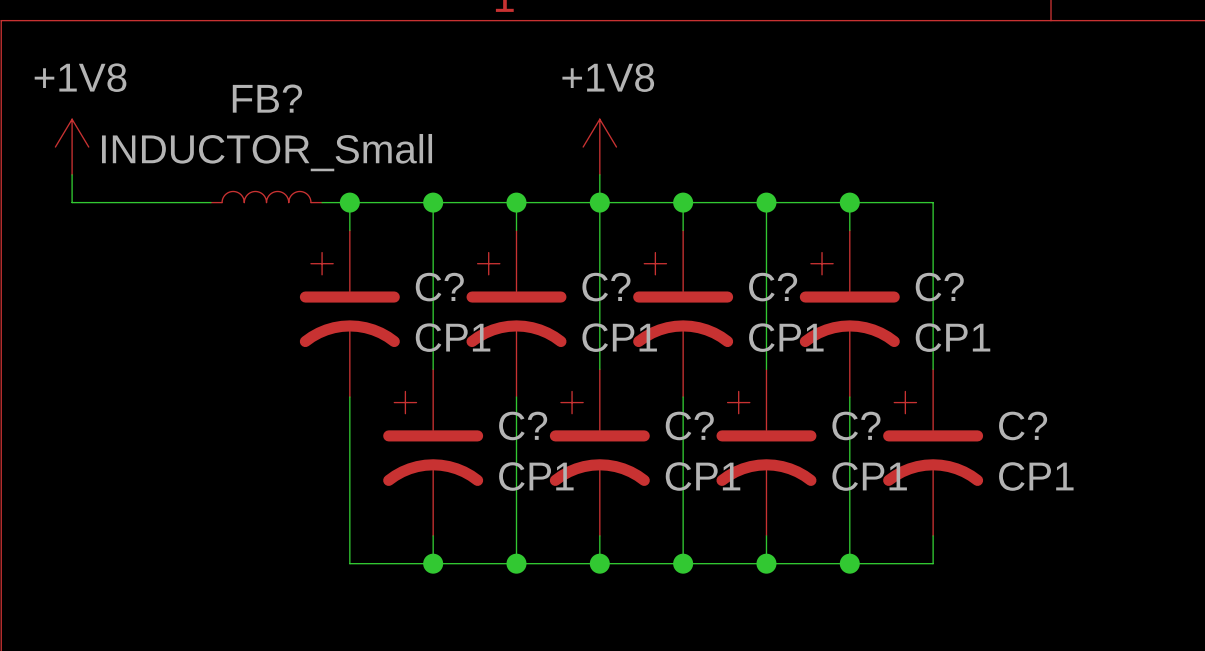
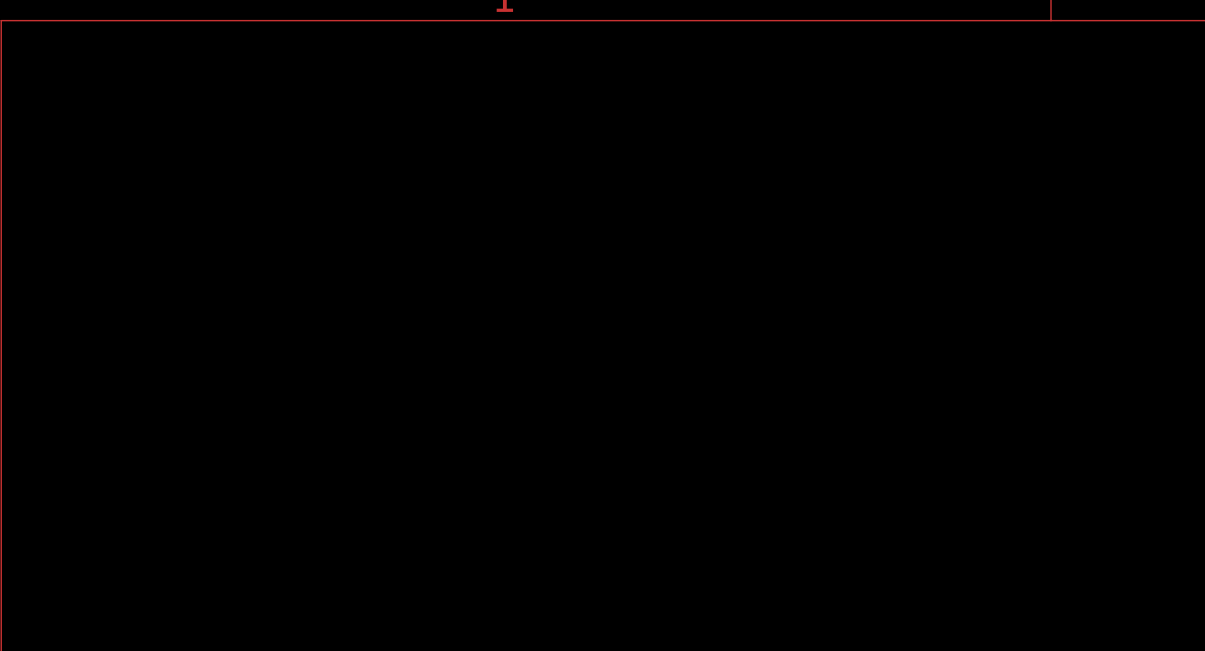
power symbol: +1V8 (72, 147) -> none
power symbol: +1V8 (599, 147) -> none
wire: (72, 174) (72, 202) (210, 202) -> none
wire: (599, 174) (599, 369) -> none
FB?: INDUCTOR_Small (266, 197) -> none
wire: (322, 202) (933, 202) (933, 369) -> none
wire: (349, 202) (349, 230) -> none
junction: (349, 202) -> none
wire: (433, 202) (433, 369) -> none
junction: (433, 202) -> none
wire: (516, 202) (516, 230) -> none
junction: (516, 202) -> none
junction: (599, 202) -> none
wire: (683, 202) (683, 230) -> none
junction: (683, 202) -> none
wire: (766, 202) (766, 369) -> none
junction: (766, 202) -> none
wire: (849, 202) (849, 230) -> none
junction: (849, 202) -> none
C?: CP1 (349, 313) -> none
C?: CP1 (516, 313) -> none
C?: CP1 (683, 313) -> none
C?: CP1 (849, 313) -> none
wire: (349, 397) (349, 563) (933, 563) (933, 535) -> none
wire: (516, 397) (516, 563) -> none
wire: (683, 397) (683, 563) -> none
wire: (849, 397) (849, 563) -> none
C?: CP1 (433, 452) -> none
C?: CP1 (599, 452) -> none
C?: CP1 (766, 452) -> none
C?: CP1 (933, 452) -> none
wire: (433, 535) (433, 563) -> none
wire: (599, 535) (599, 563) -> none
wire: (766, 535) (766, 563) -> none
junction: (433, 563) -> none
junction: (516, 563) -> none
junction: (599, 563) -> none
junction: (683, 563) -> none
junction: (766, 563) -> none
junction: (849, 563) -> none

